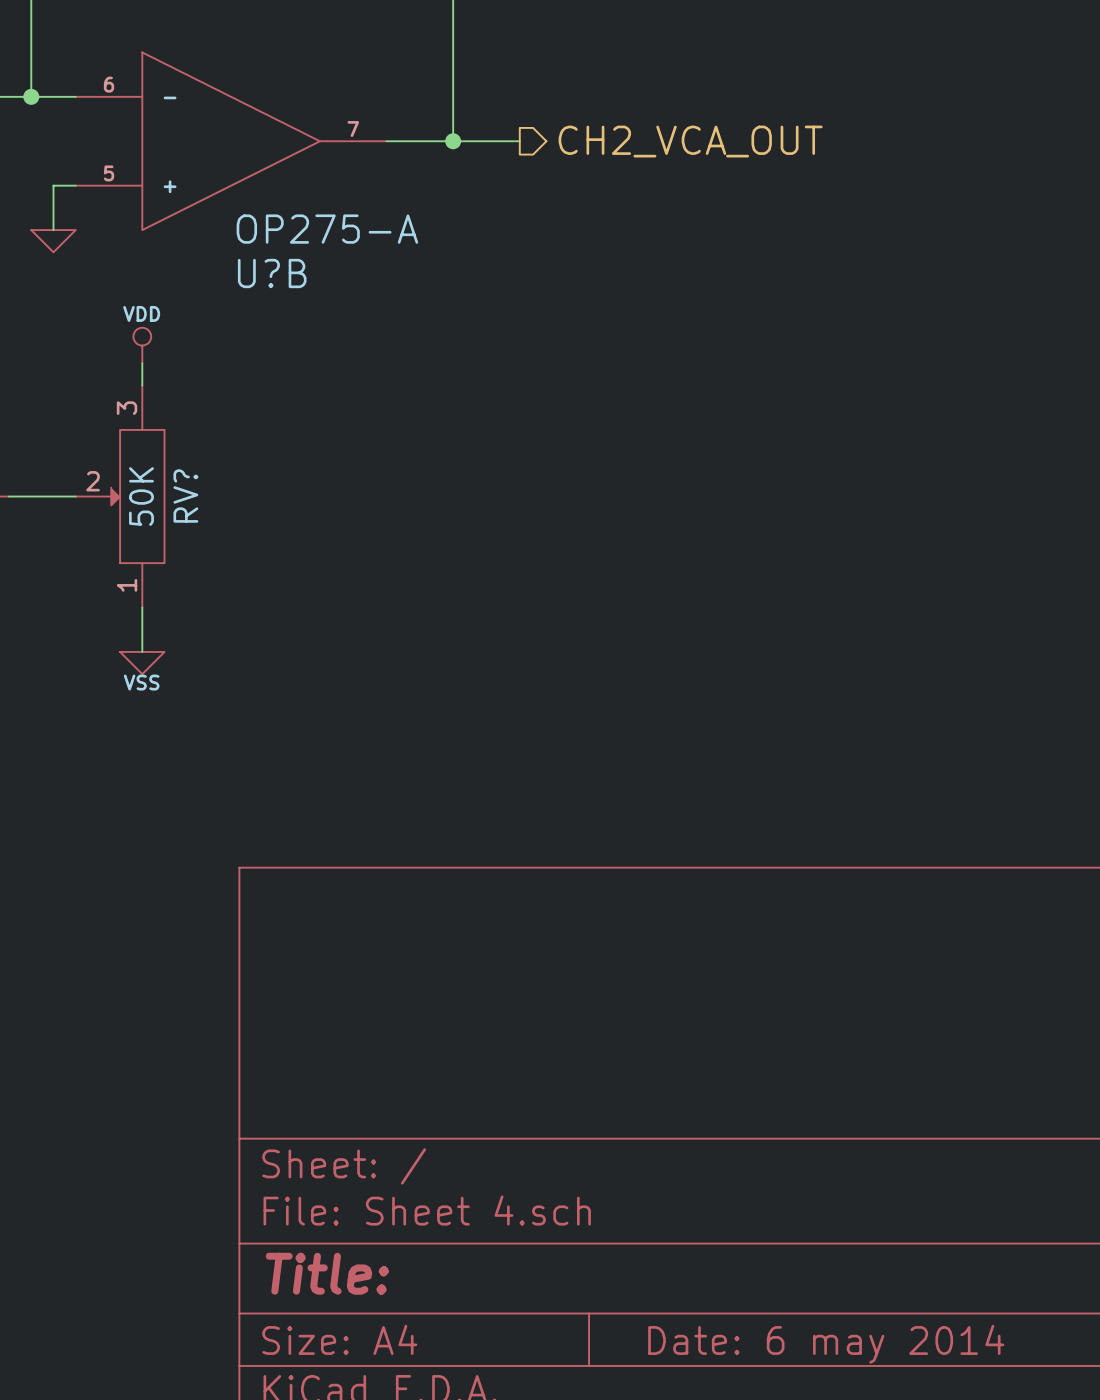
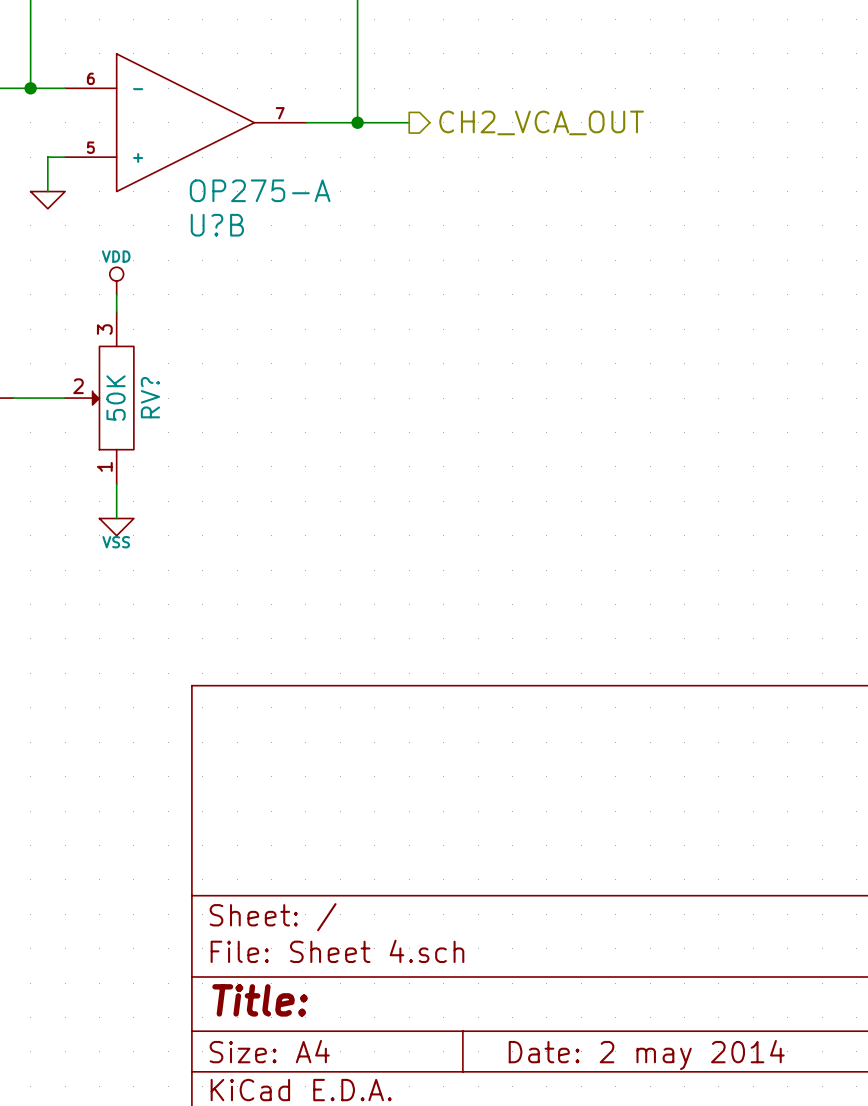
title block: Date: 6 may 2014 (826, 1344) -> Date: 2 may 2014 (646, 1055)

